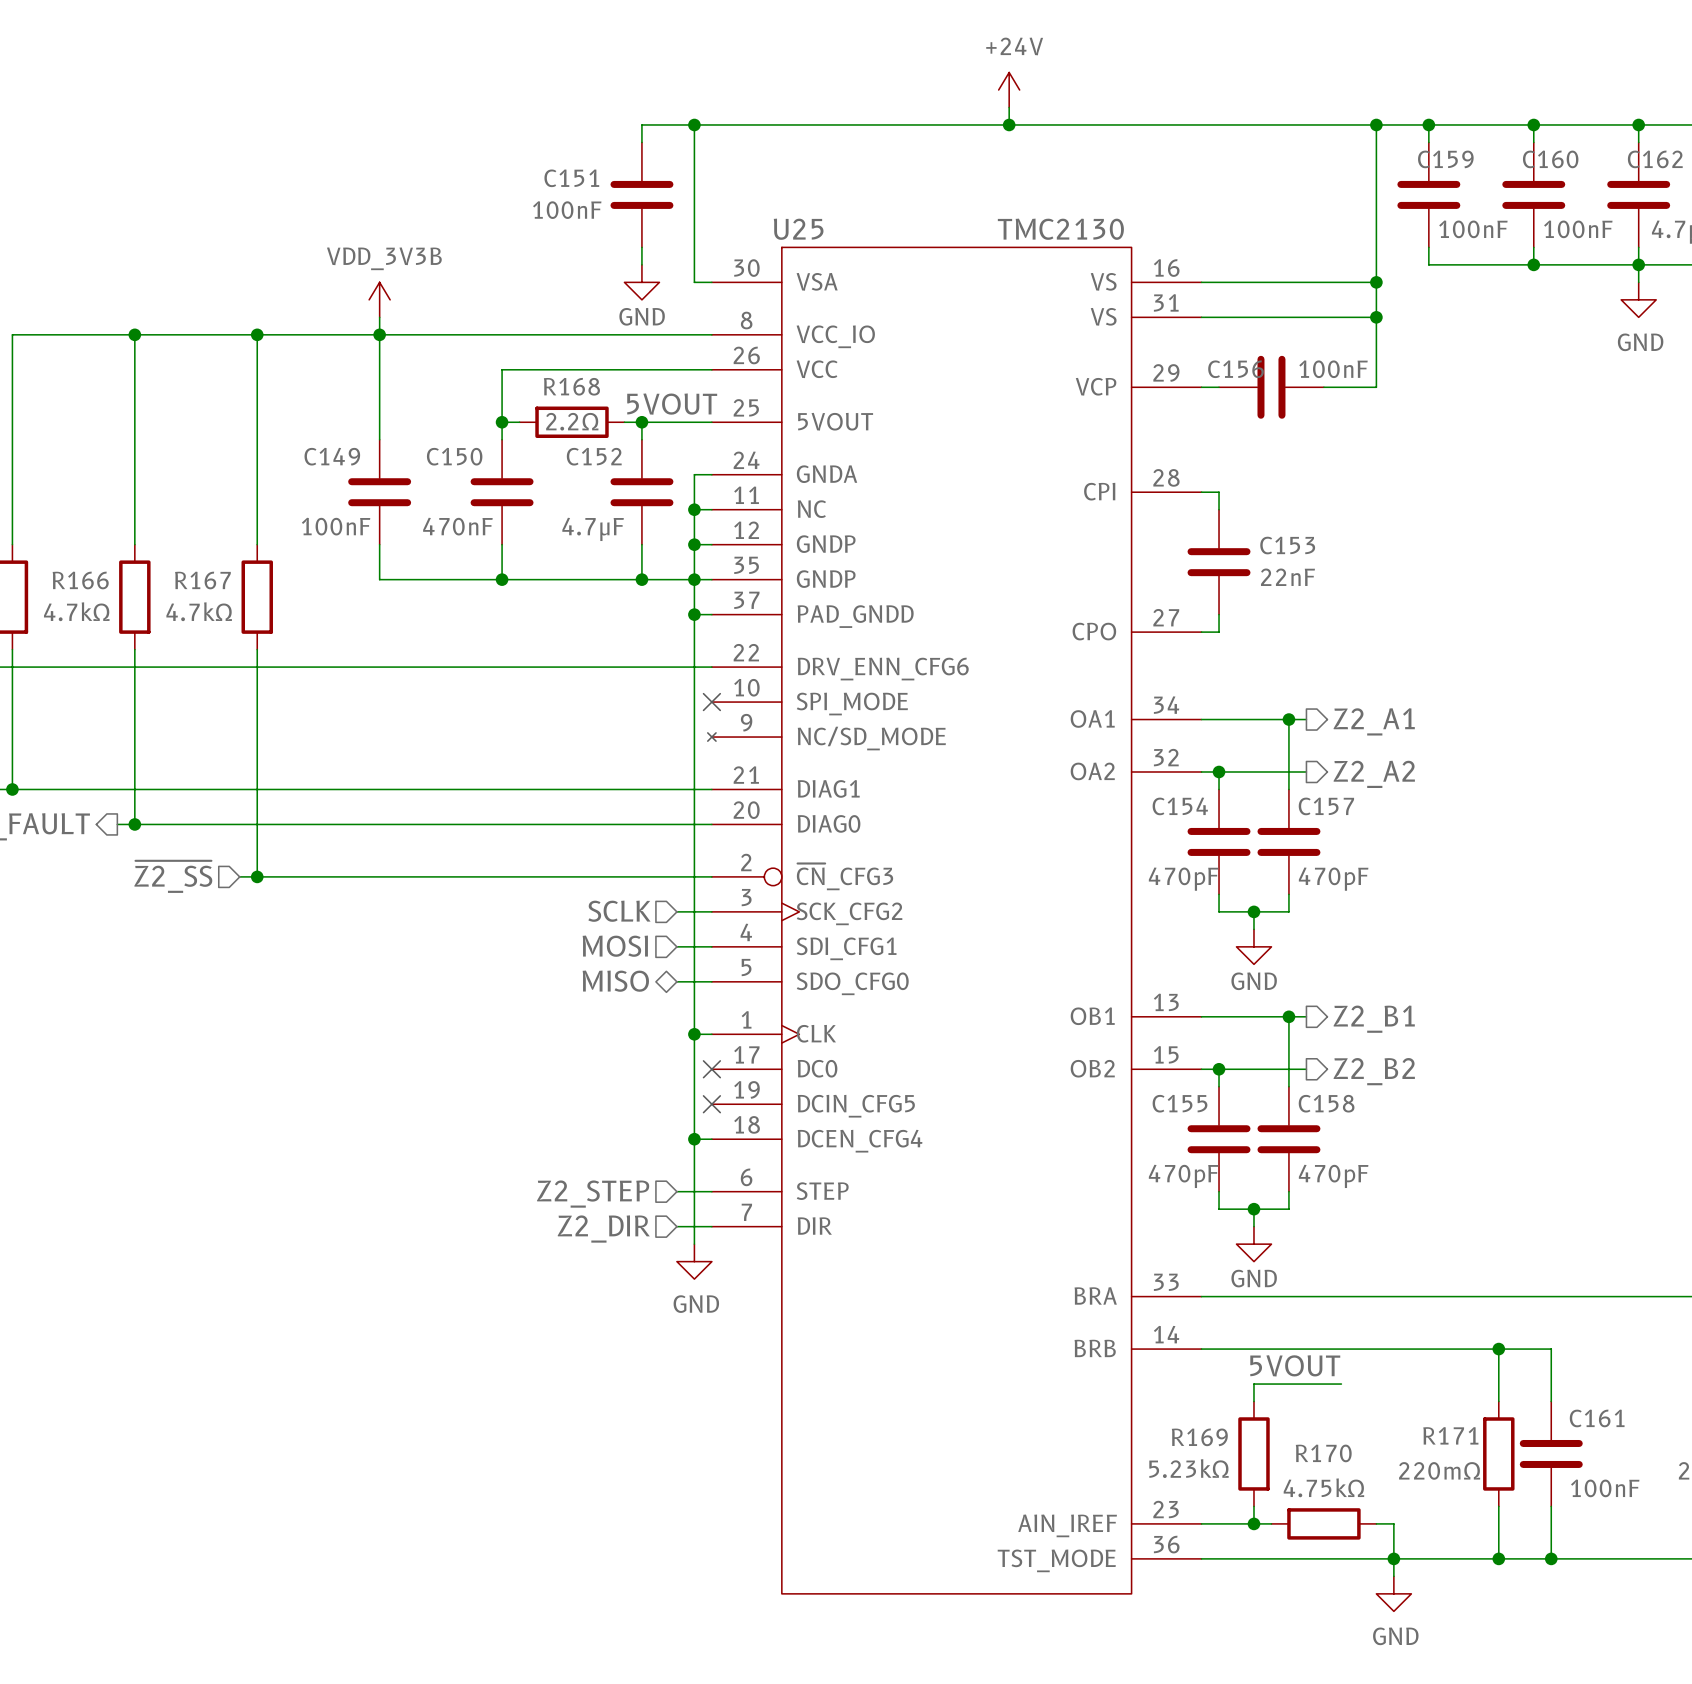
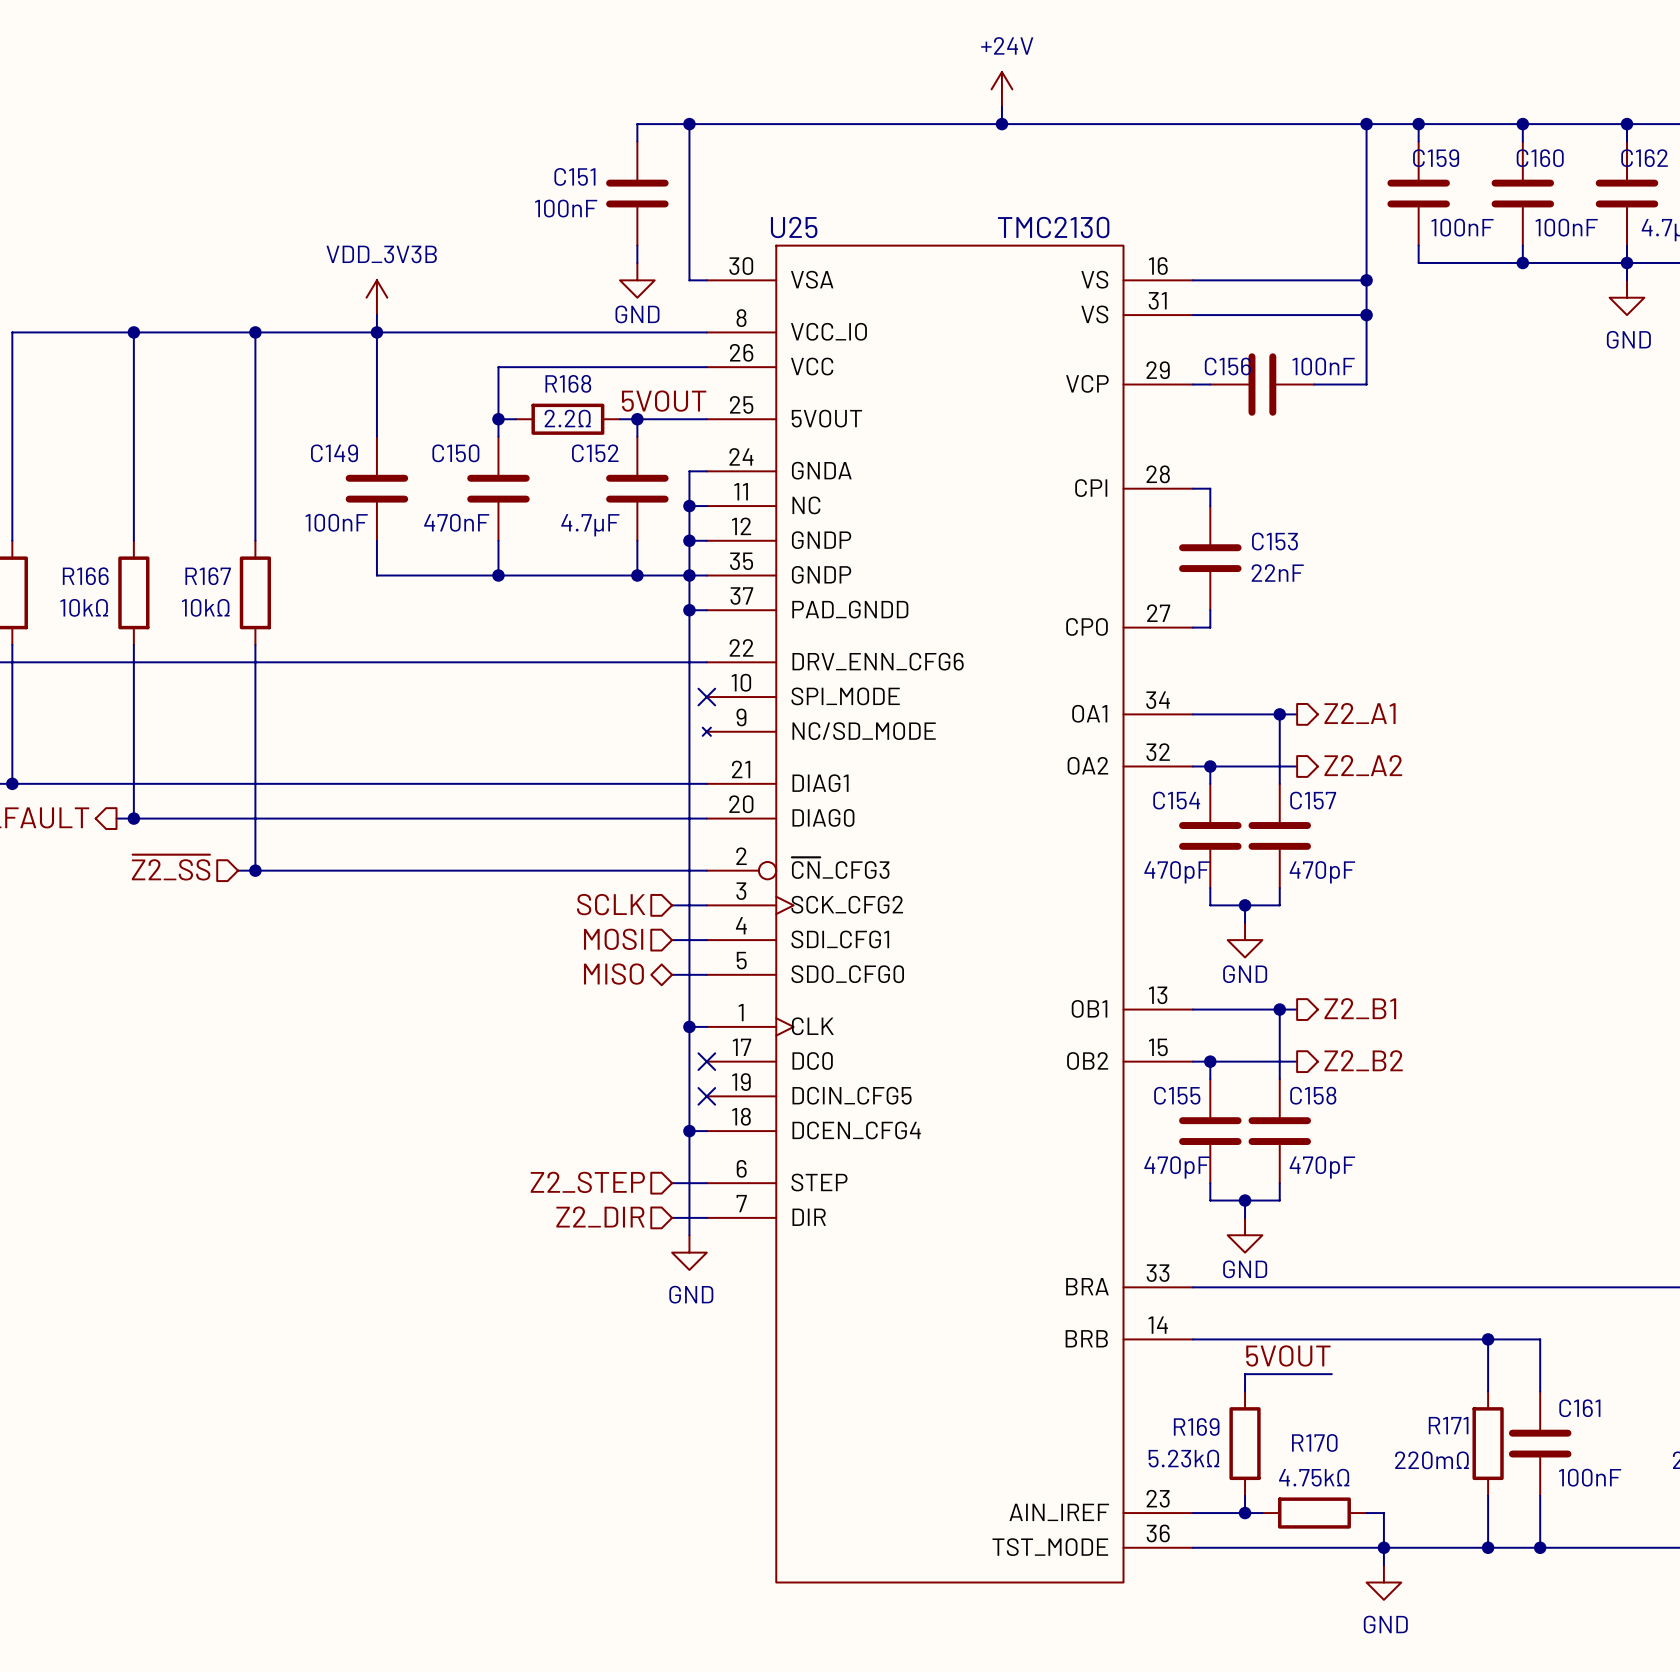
R166 value: 4.7kΩ (76, 611) -> 10kΩ (84, 607)
R167 value: 4.7kΩ (199, 611) -> 10kΩ (205, 607)

